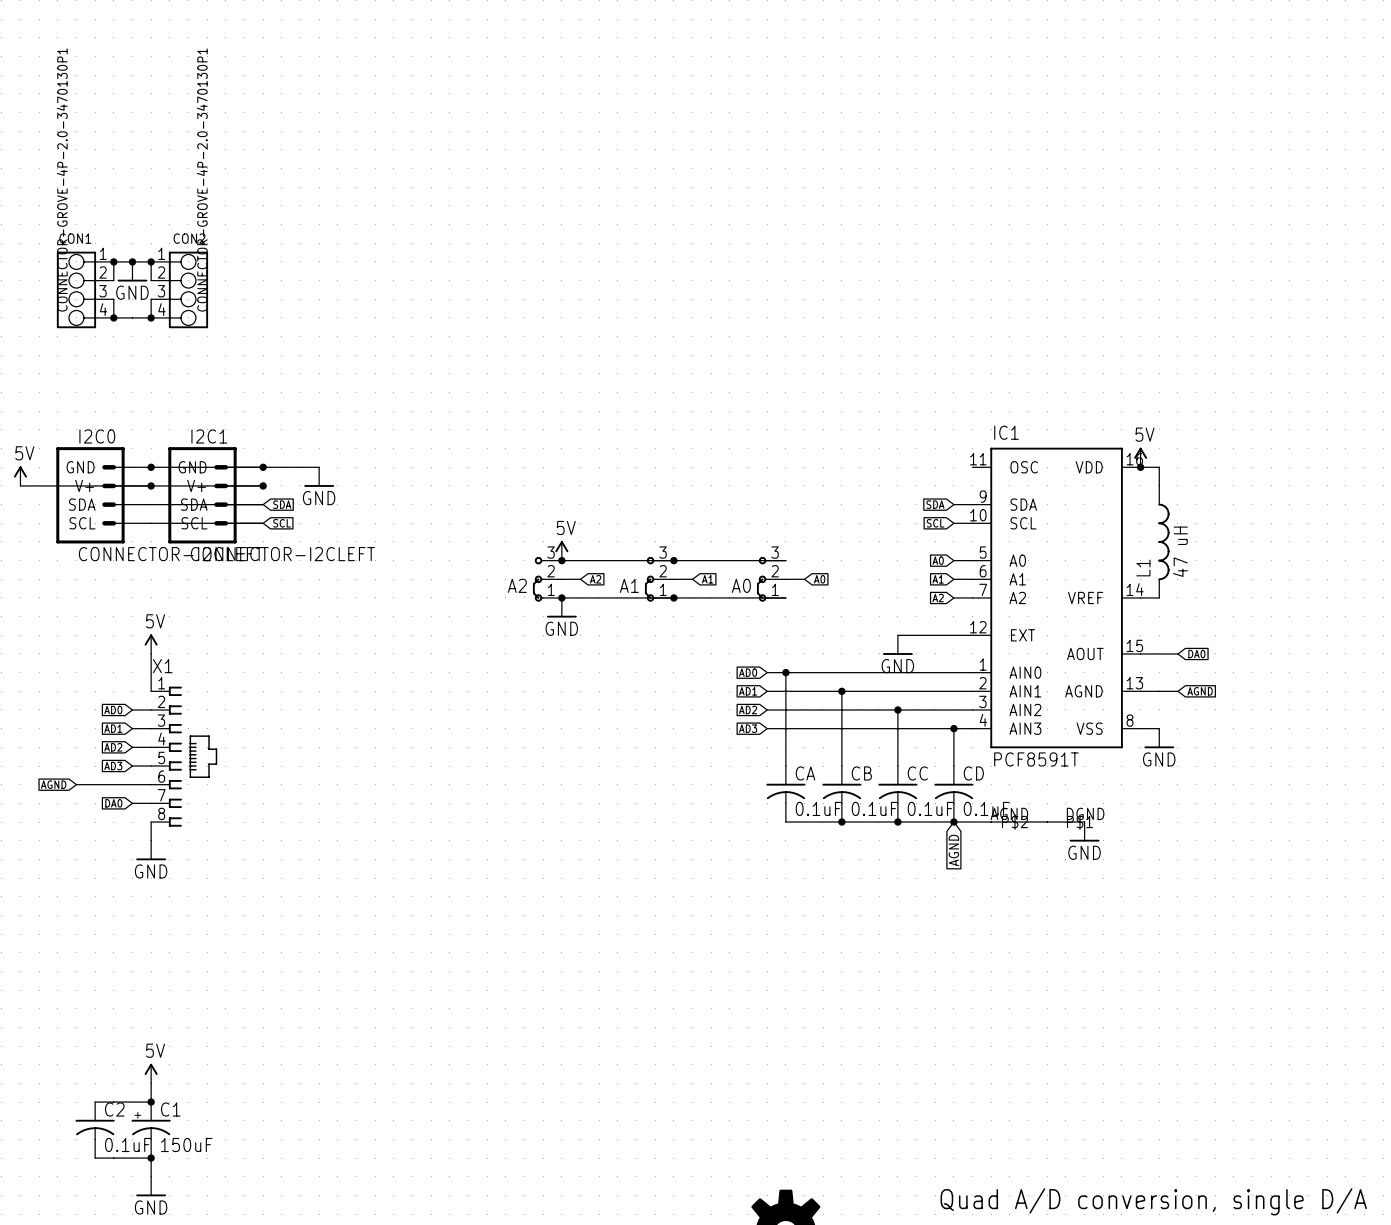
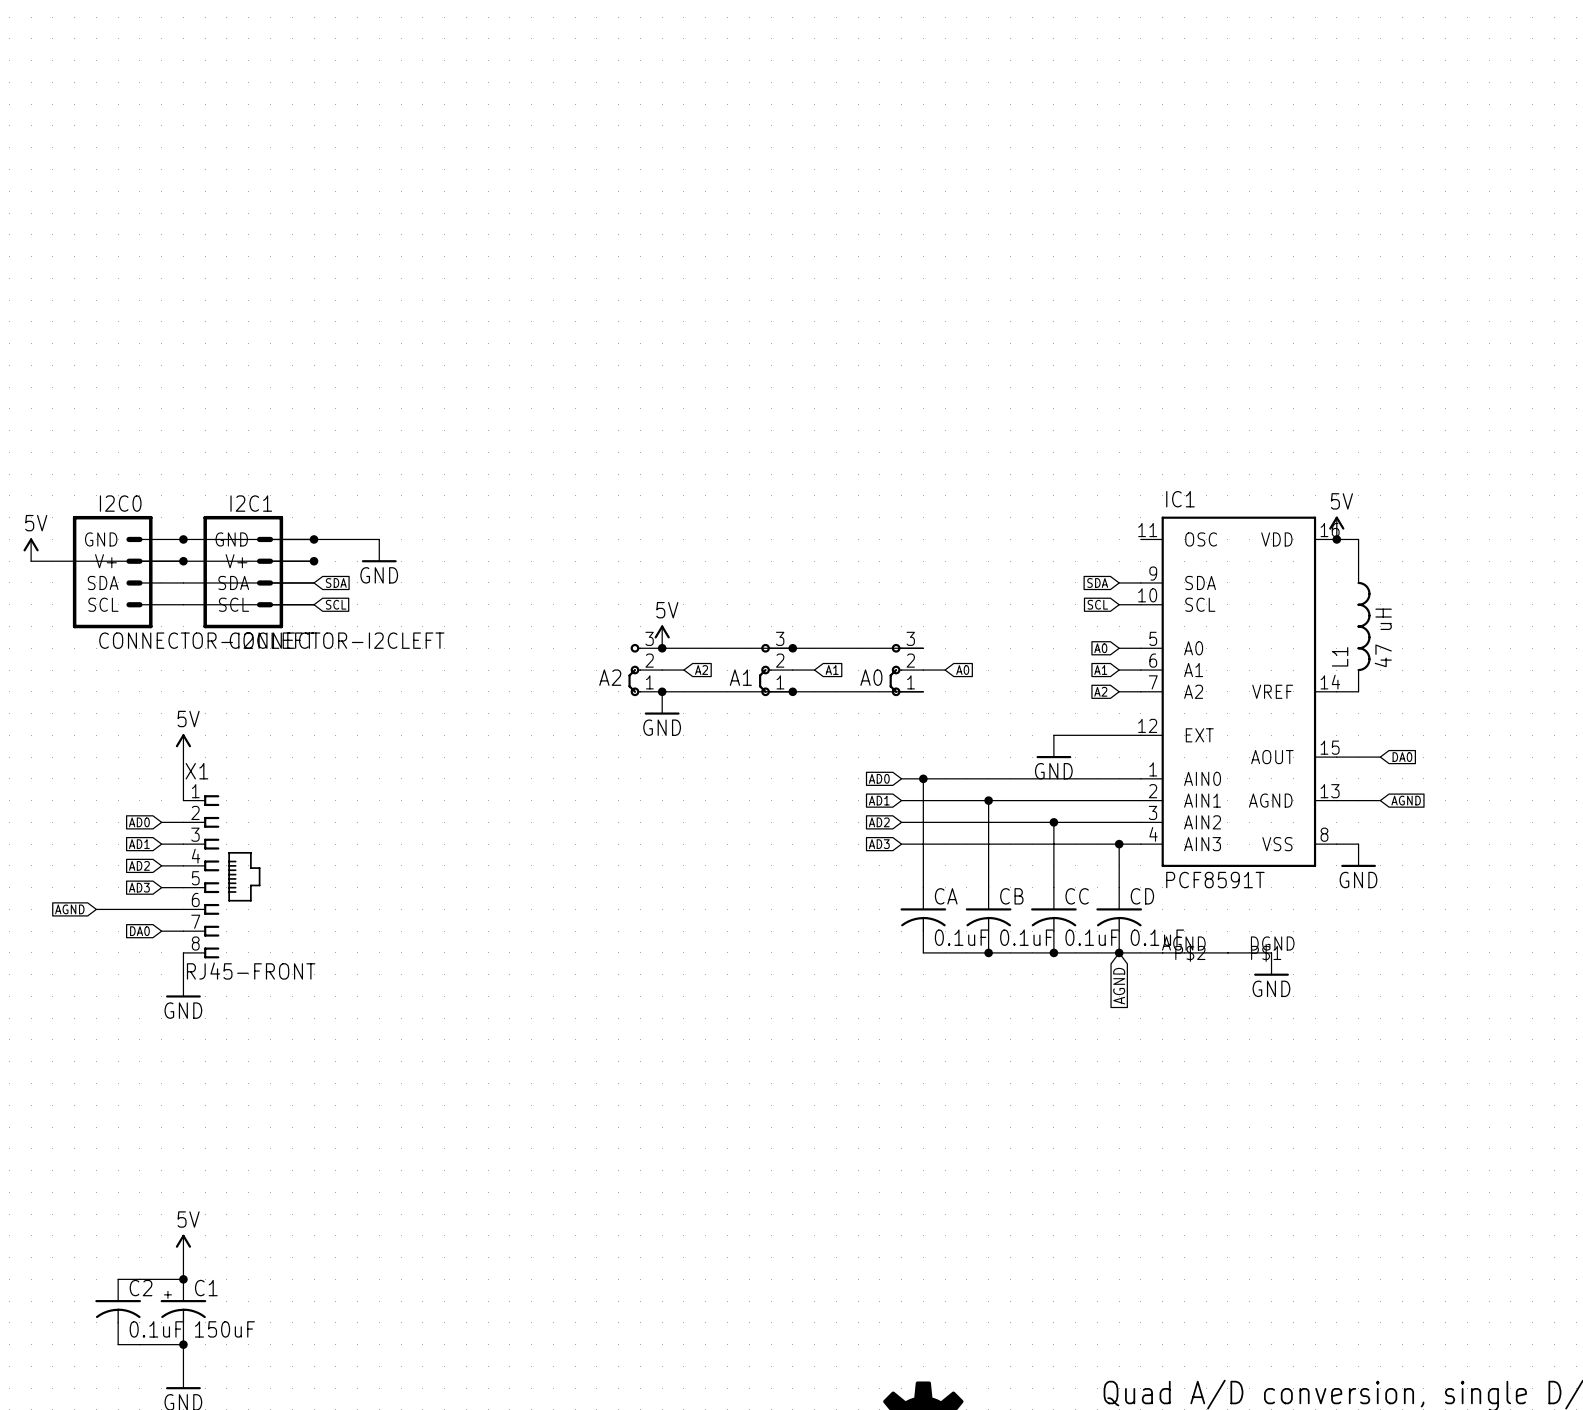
junction: (113, 261) -> none
junction: (132, 261) -> none
junction: (151, 261) -> none
power symbol: GND (132, 271) -> none
wire: (113, 280) (113, 261) (151, 261) (151, 280) -> none
CON1: CONNECTOR-GROVE-4P-2.0-3470130P1 (85, 289) -> none
CON2: CONNECTOR-GROVE-4P-2.0-3470130P1 (179, 289) -> none
wire: (113, 299) (113, 317) (151, 317) (151, 299) -> none
junction: (113, 317) -> none
junction: (151, 317) -> none
X1 value: none -> RJ45-FRONT (251, 971)

